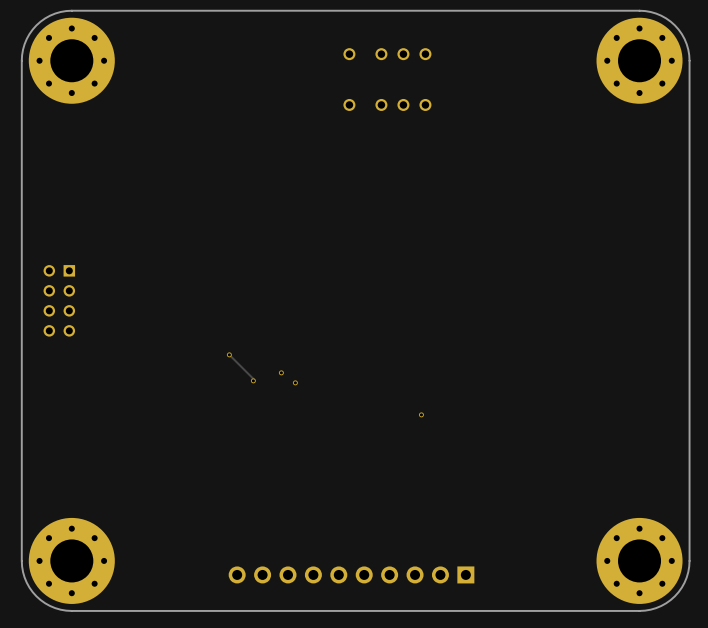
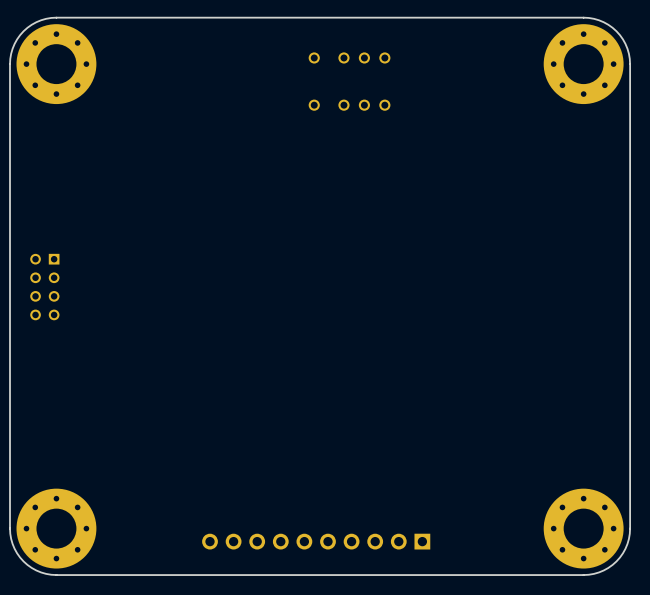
track: (229, 354) (253, 380) -> none
via: (229, 354) -> none
via: (281, 372) -> none
via: (253, 380) -> none
via: (295, 382) -> none
via: (421, 414) -> none

